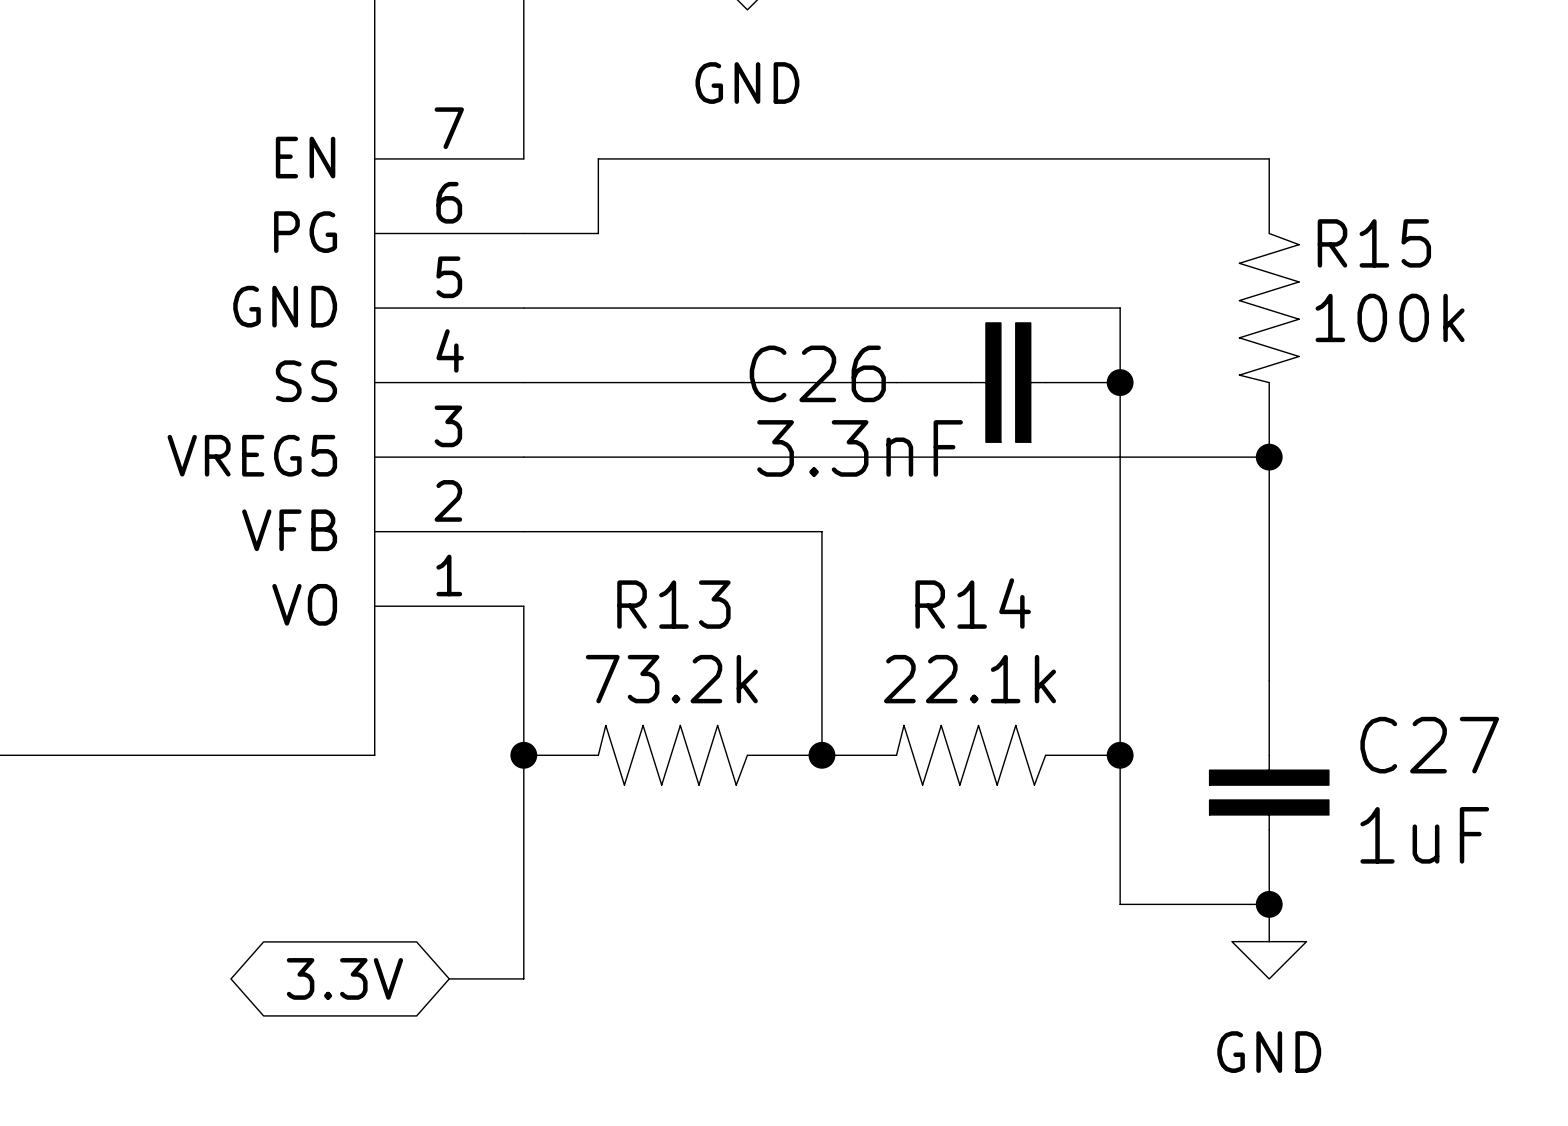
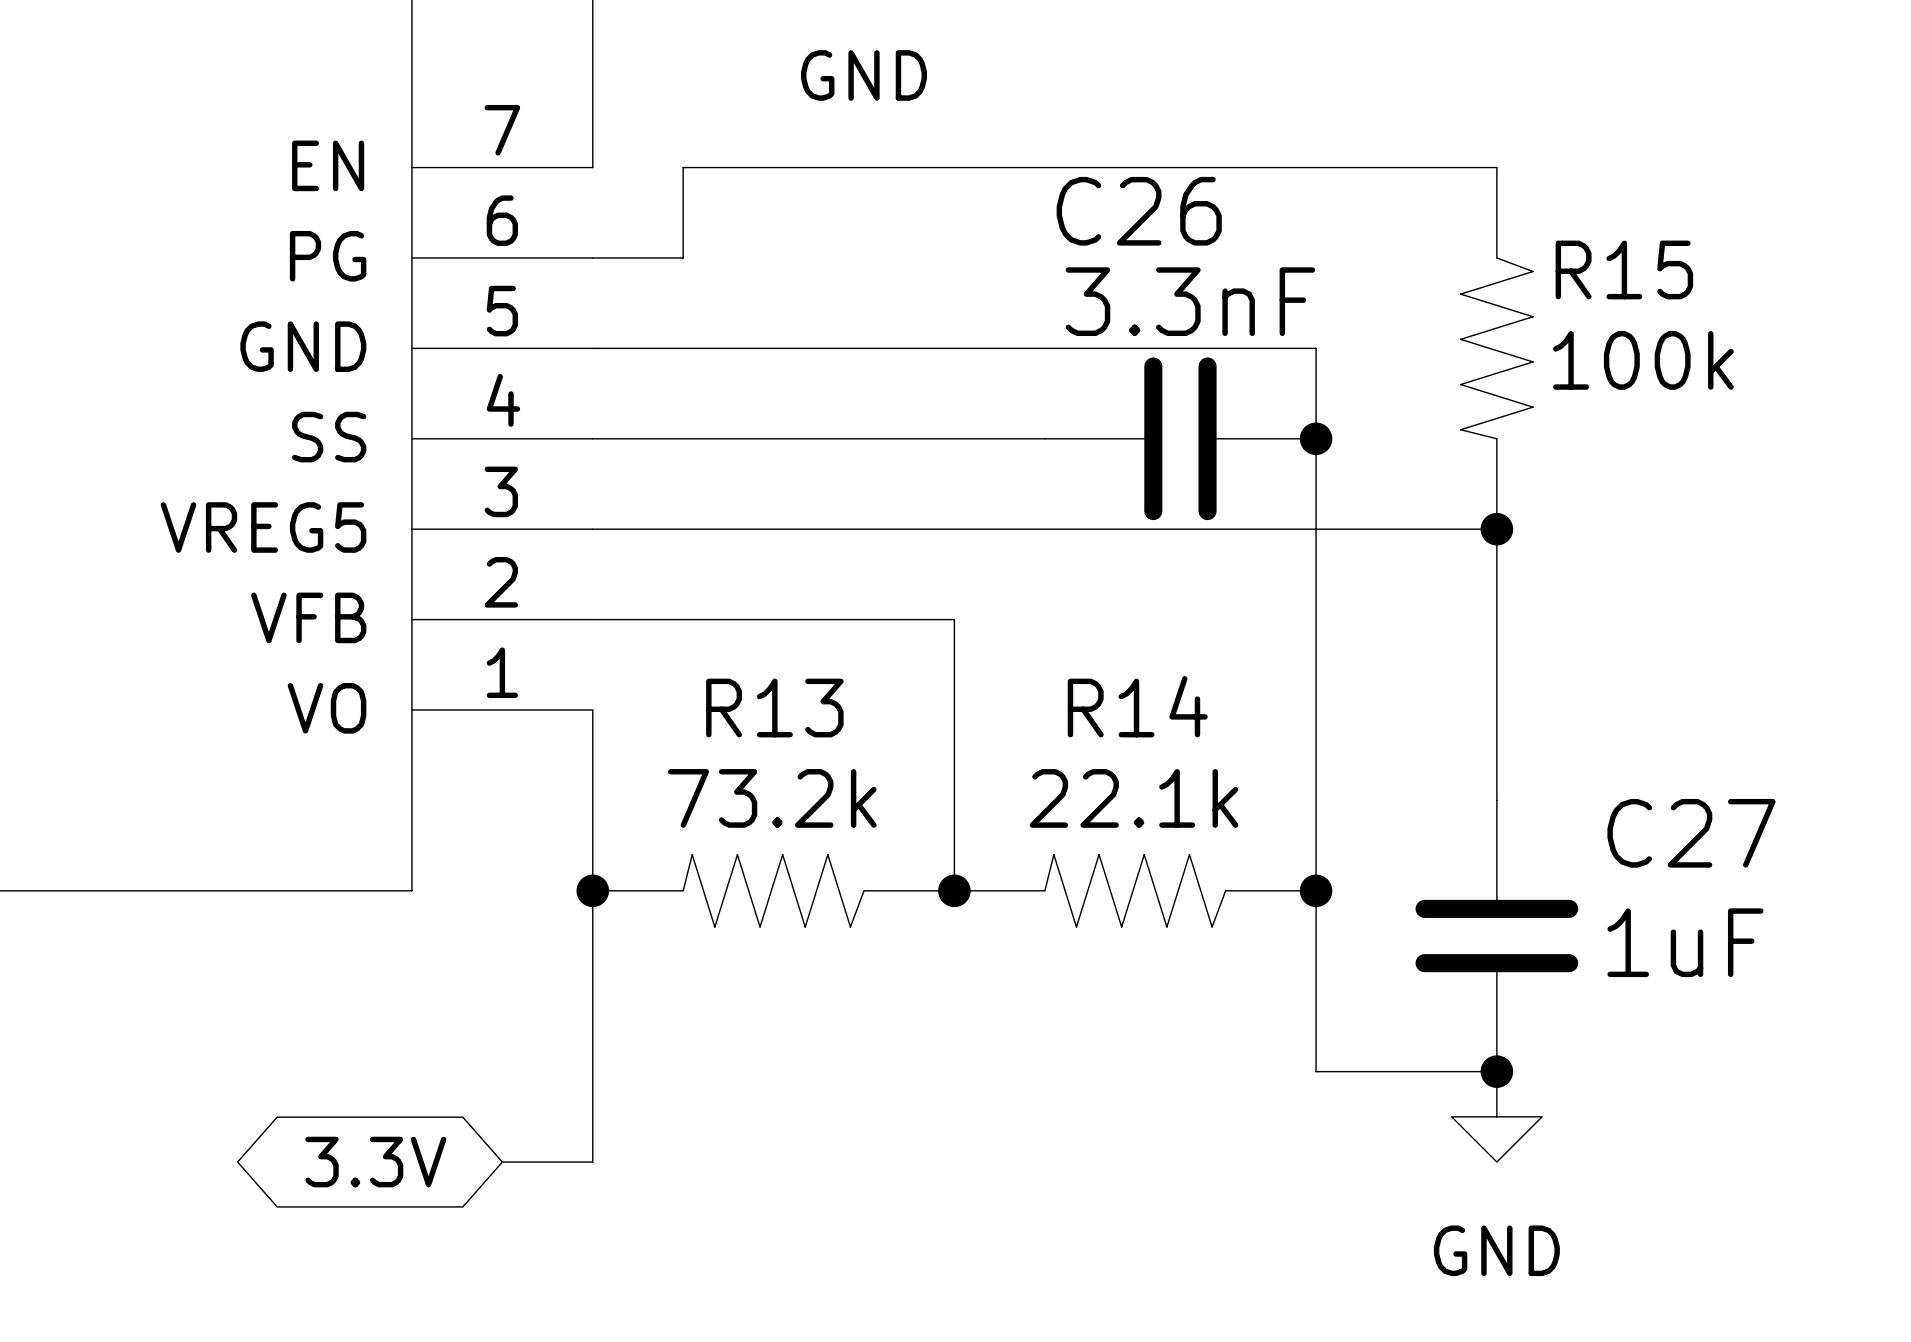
C26 symbol: [896, 322, 1121, 443] -> [1044, 357, 1317, 521]
C26 name position: C26 (817, 373) -> C26 (1139, 211)
C26 value position: 3.3nF (860, 448) -> 3.3nF (1190, 301)
C27 symbol: [1209, 680, 1329, 905] -> [1415, 800, 1579, 1072]
C27 name position: C27 (1429, 745) -> C27 (1691, 833)
C27 value position: 1uF (1424, 835) -> 1uF (1685, 942)

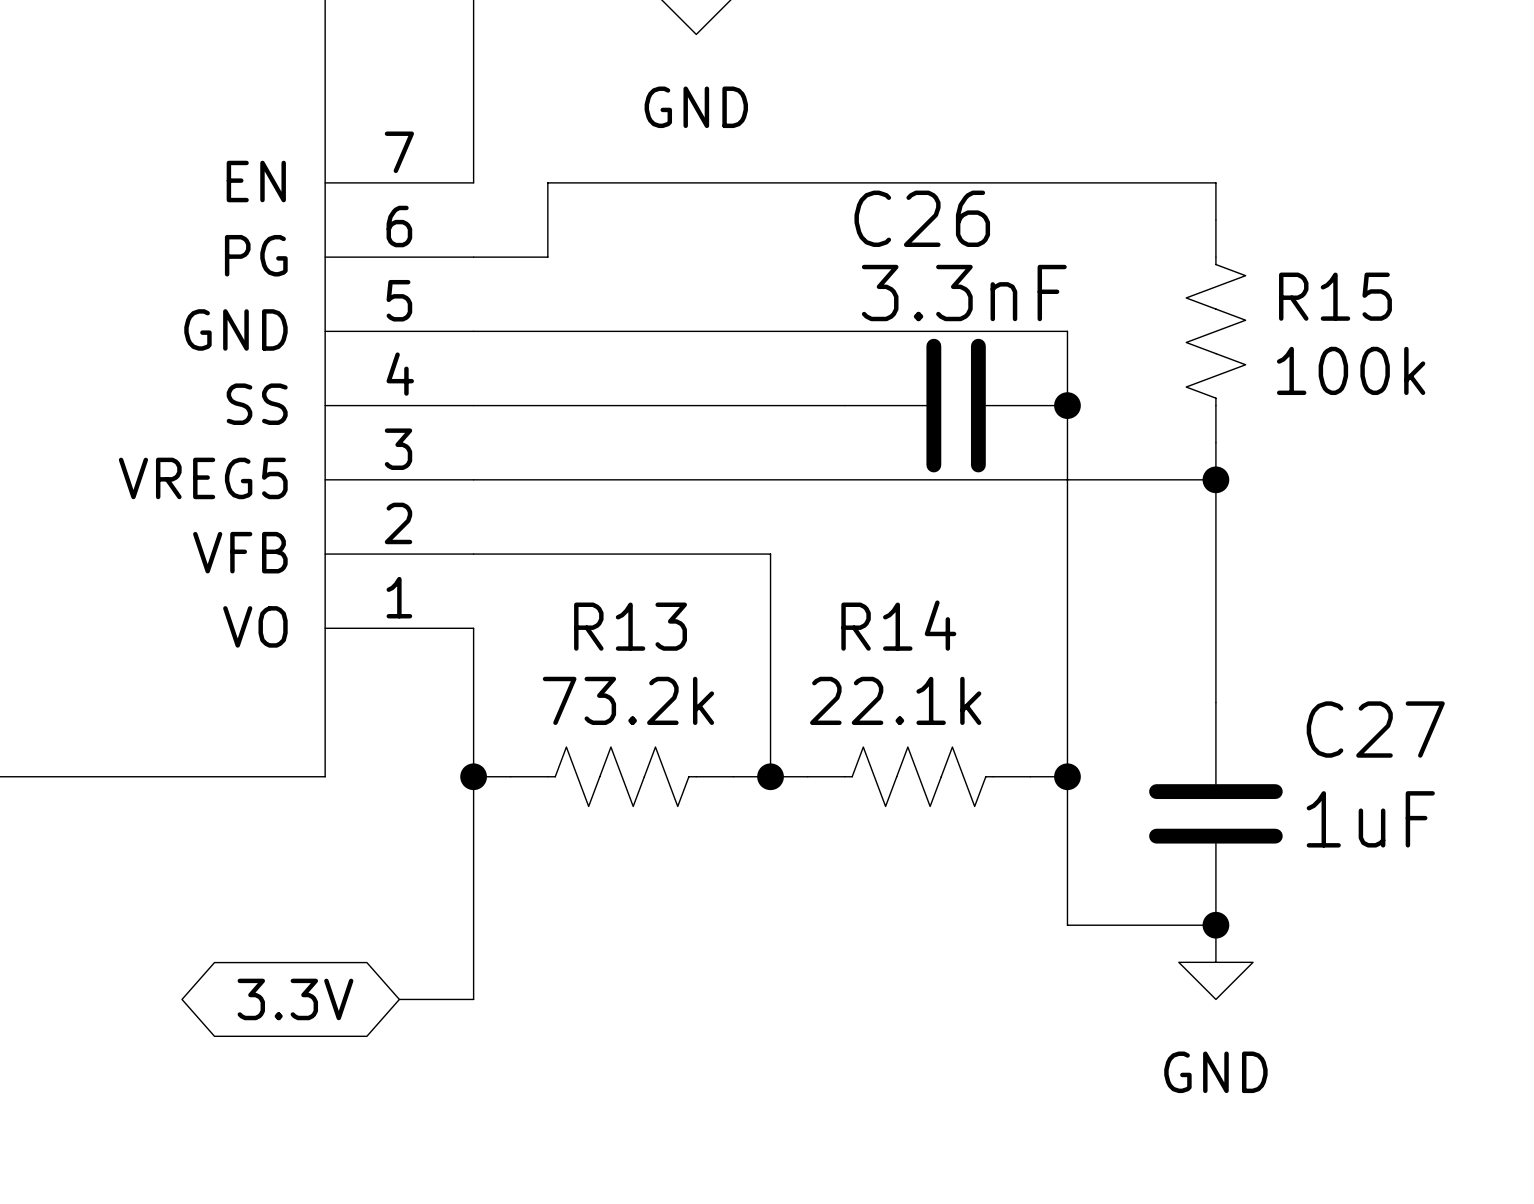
R15 symbol: [1460, 167, 1534, 530] -> [1186, 220, 1246, 443]
R13 symbol: [592, 854, 955, 927] -> [510, 747, 734, 807]
R14 symbol: [954, 854, 1317, 927] -> [807, 747, 1031, 807]

